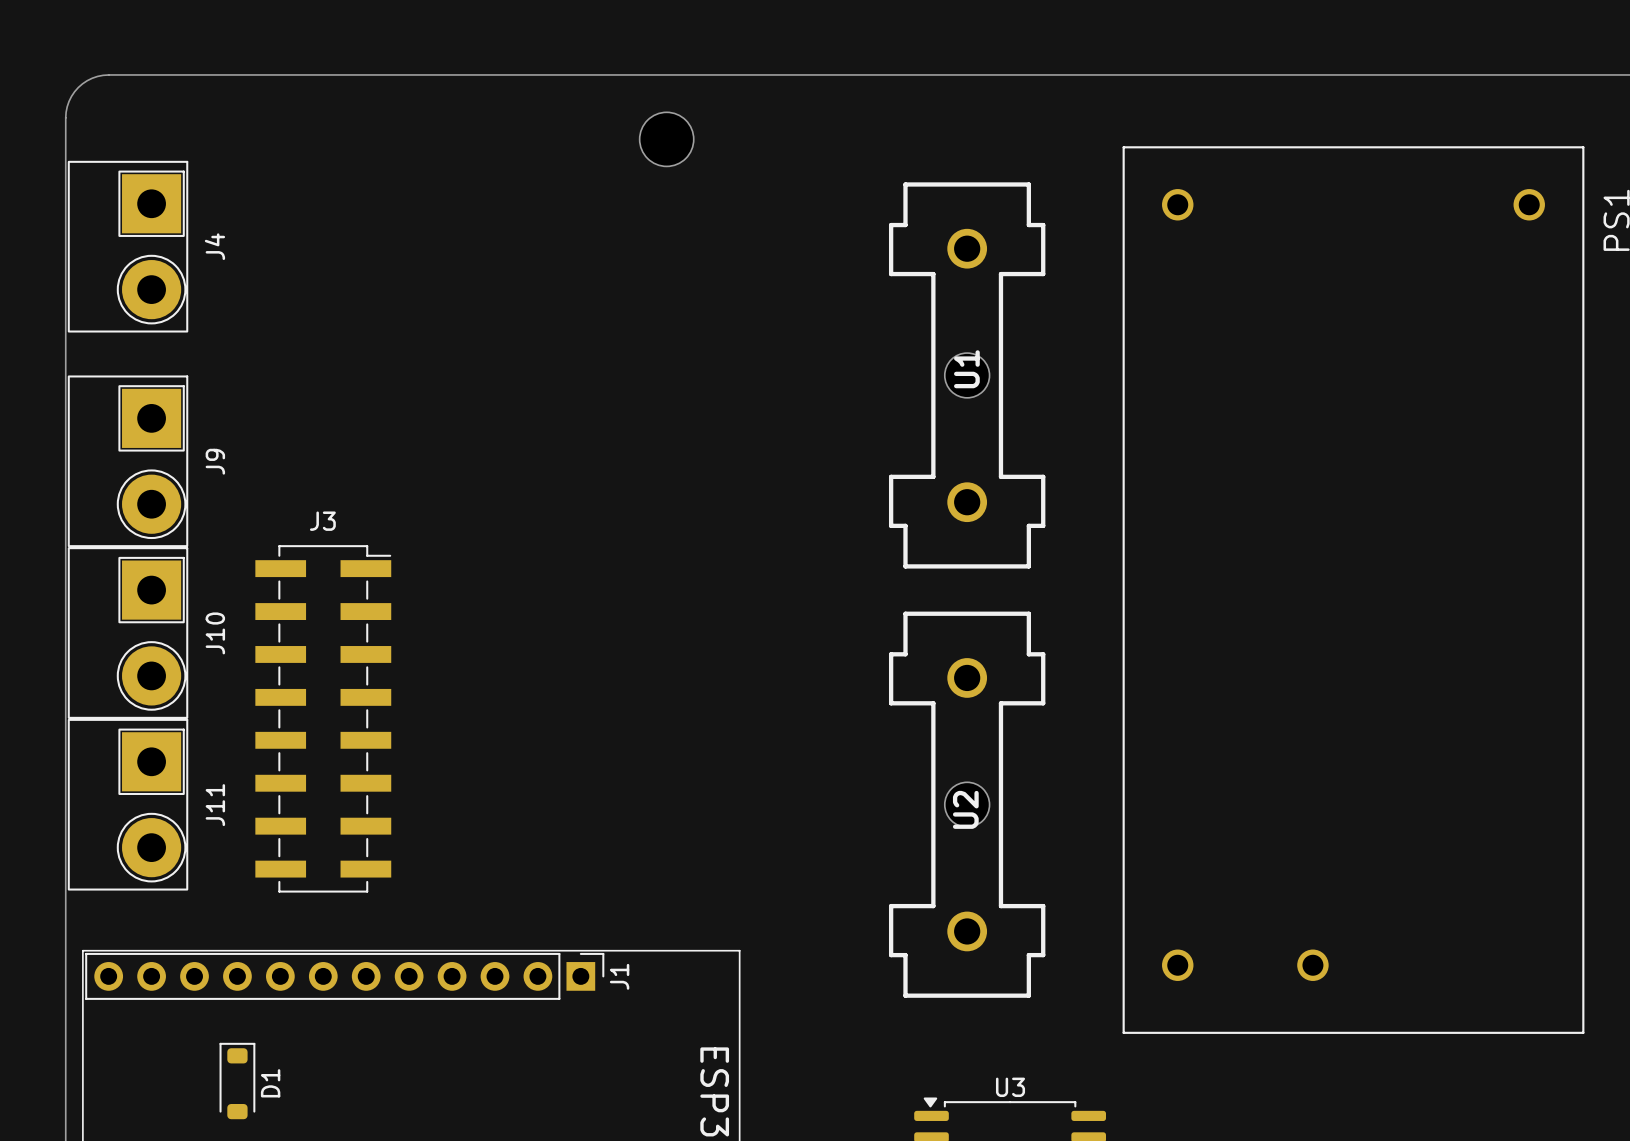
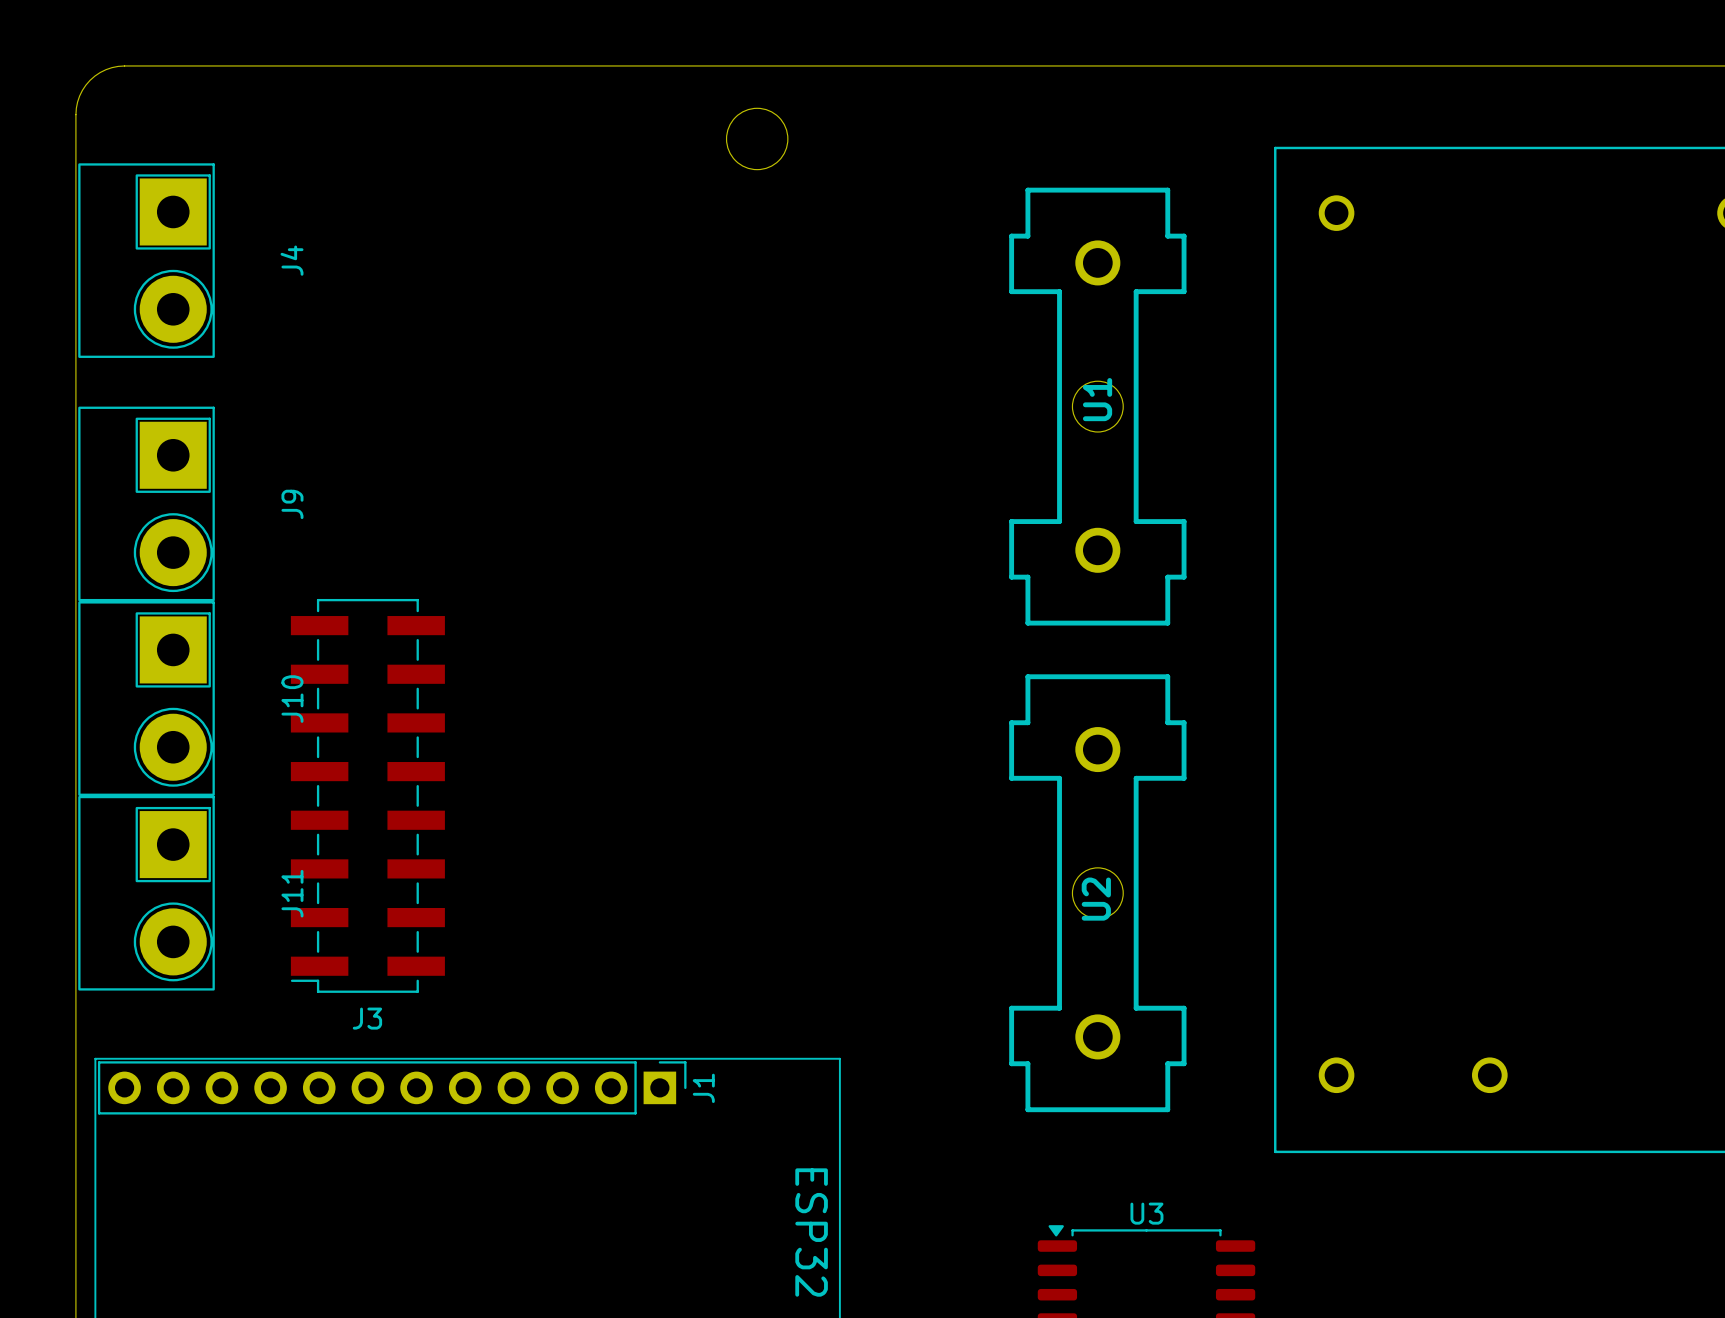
J4 name position: J4 (214, 246) -> J4 (292, 260)
J9 name position: J9 (215, 461) -> J9 (292, 504)
J10 name position: J10 (215, 633) -> J10 (292, 699)
J3 rotation: 0° (323, 718) -> 180° (367, 795)
J11 name position: J11 (215, 805) -> J11 (292, 893)
D1: (237, 1081) -> none

